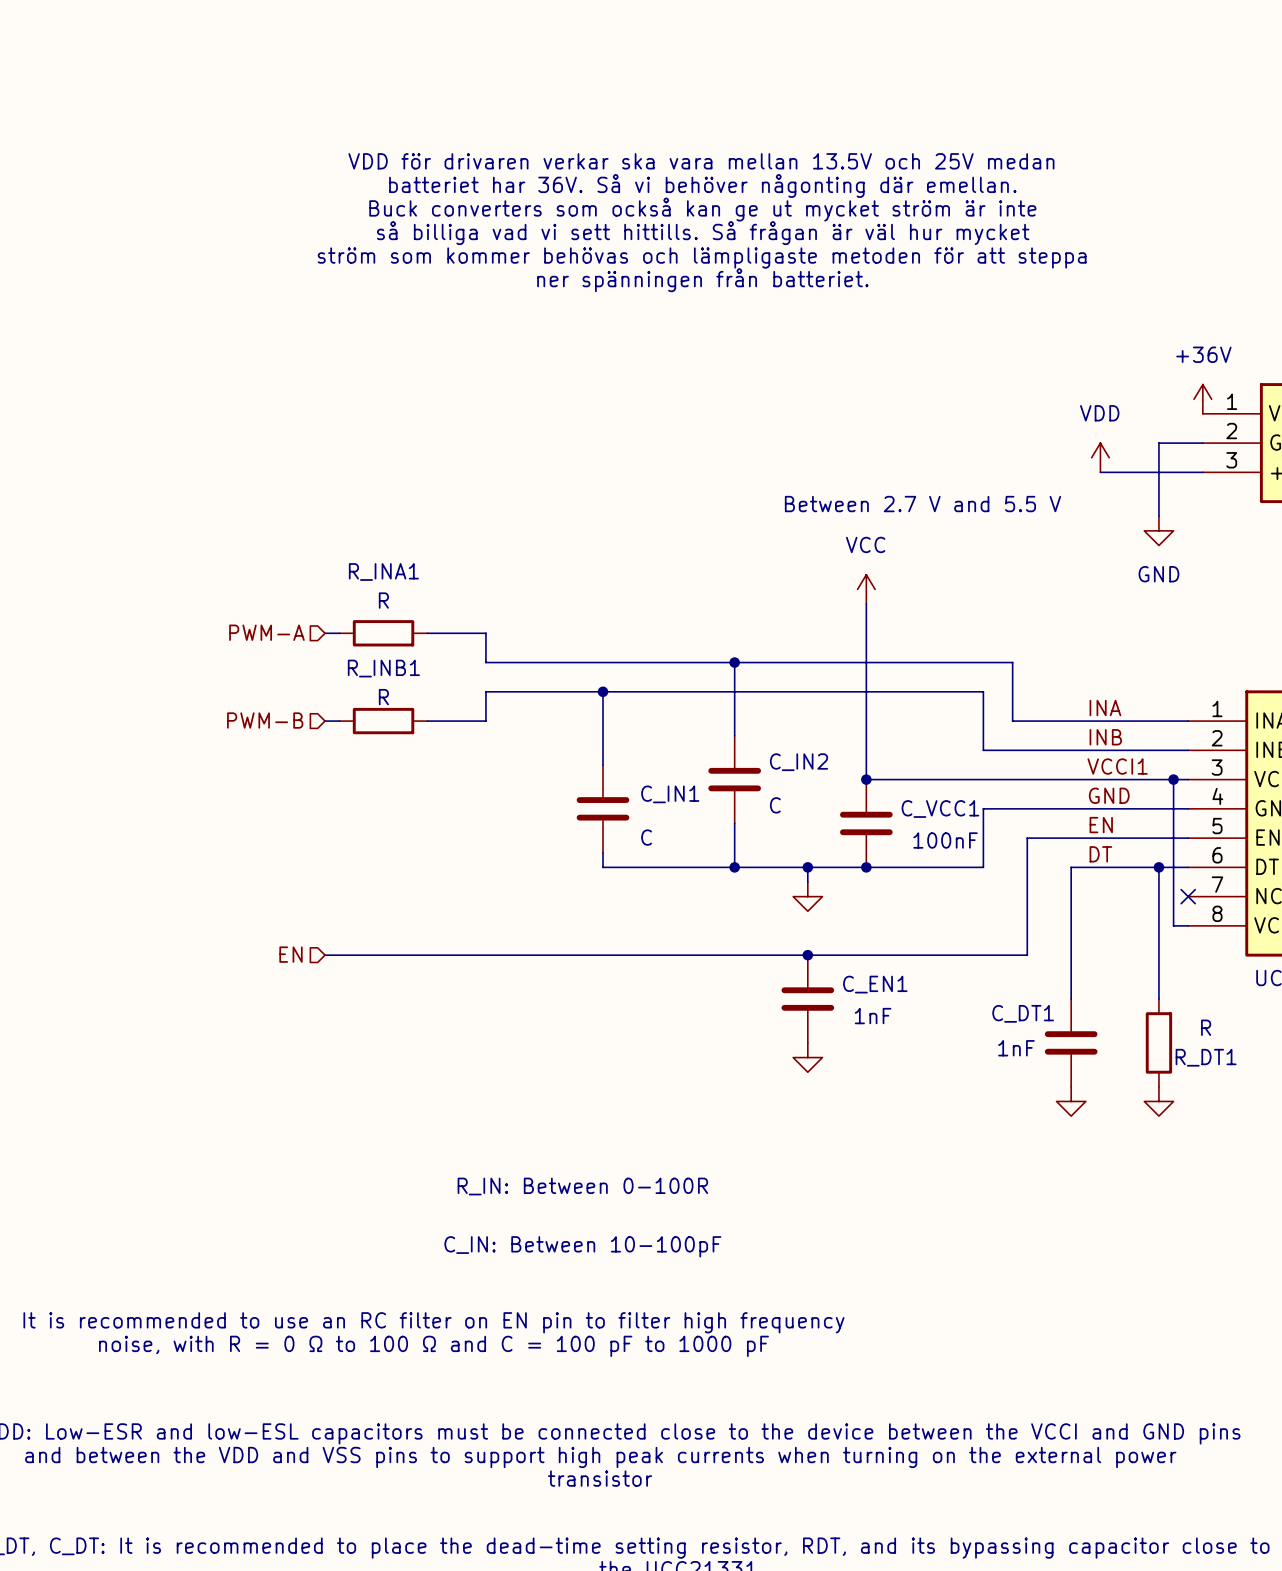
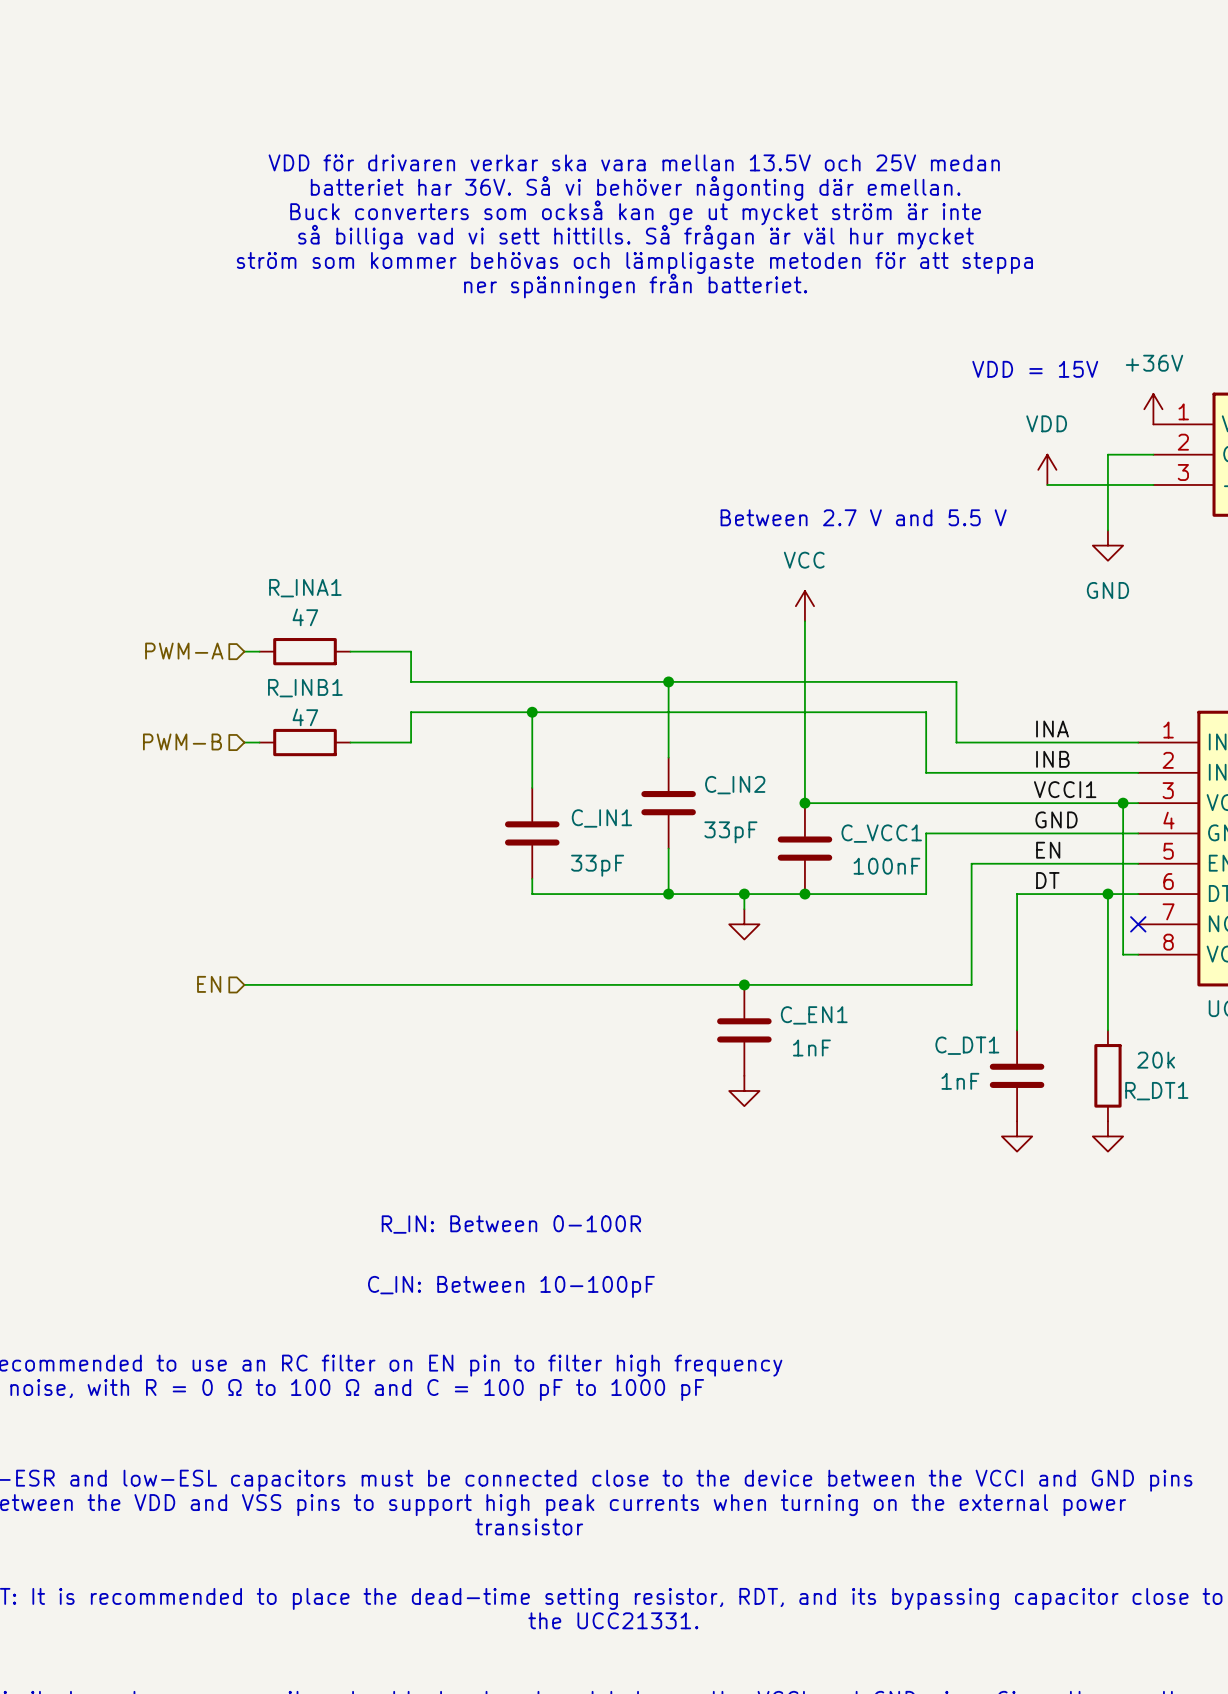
text: none -> VDD = 15V (1035, 369)
R_INA1 value: R (383, 600) -> 47 (305, 617)
R_INB1 value: R (383, 697) -> 47 (305, 717)
C_IN2 value: C (775, 805) -> 33pF (730, 832)
C_IN1 value: C (646, 837) -> 33pF (597, 865)
R_DT1 value: R (1206, 1027) -> 20k (1156, 1060)

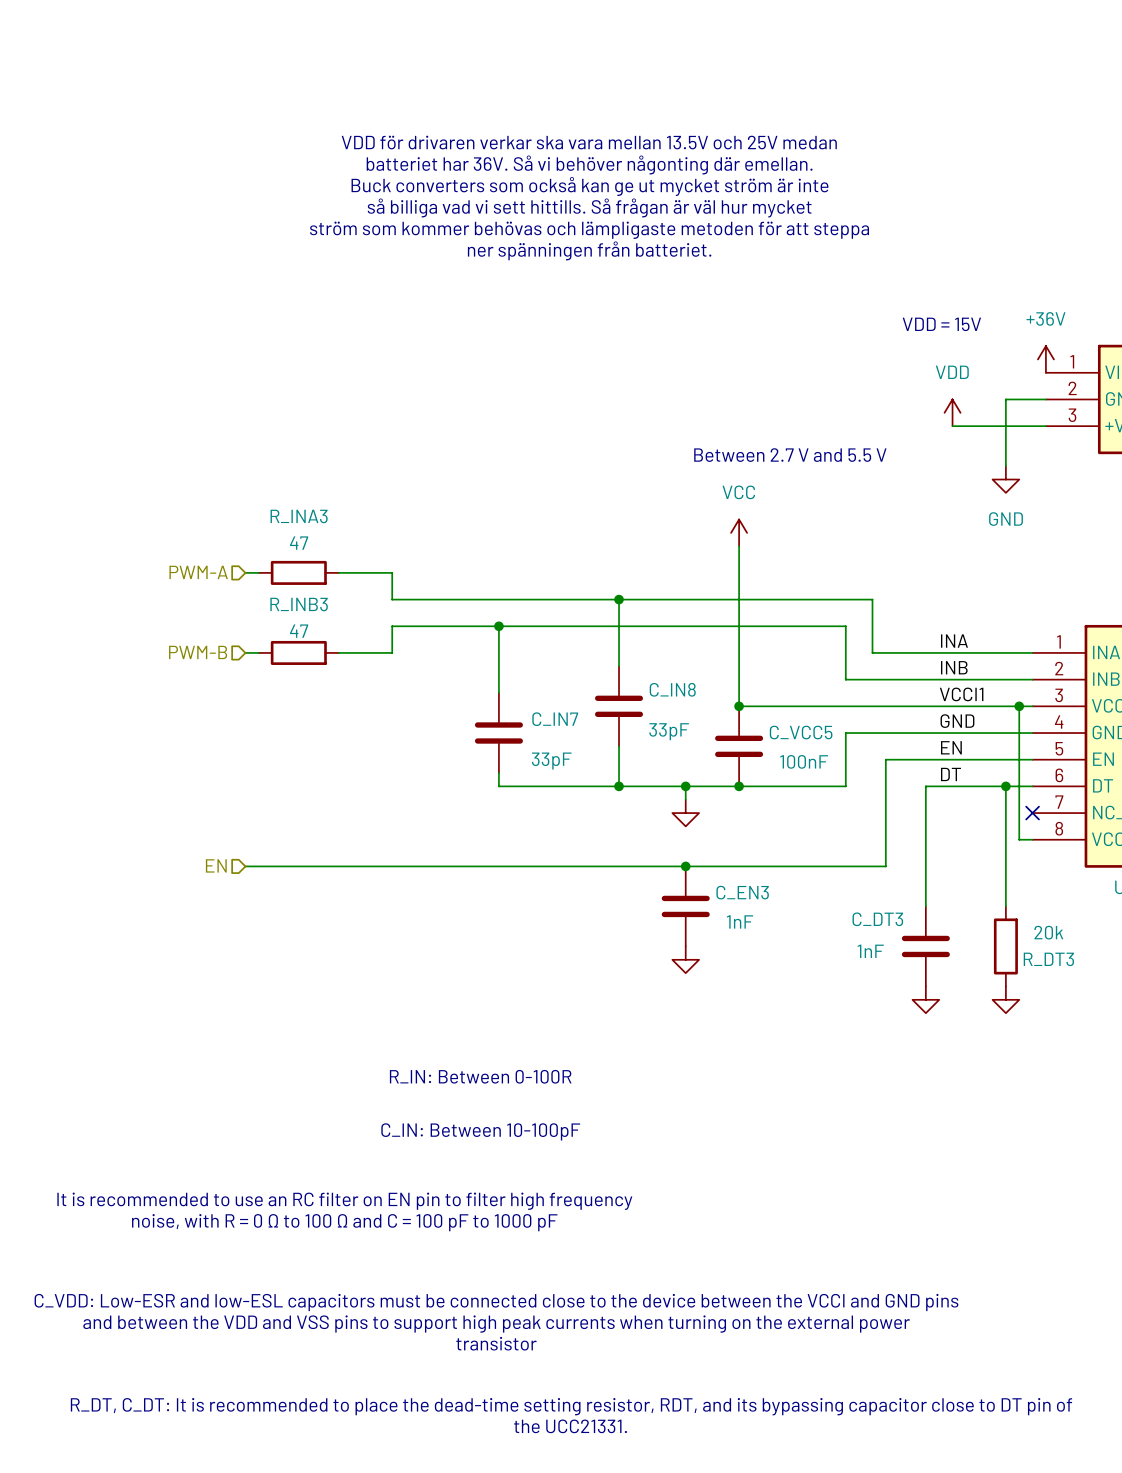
R_INA1 name: R_INA1 (305, 588) -> R_INA3 (299, 516)
R_INB1 name: R_INB1 (305, 688) -> R_INB3 (299, 604)
C_IN2 name: C_IN2 (735, 785) -> C_IN8 (672, 689)
C_IN1 name: C_IN1 (601, 818) -> C_IN7 (555, 719)
C_VCC1 name: C_VCC1 (881, 833) -> C_VCC5 (801, 732)
C_EN1 name: C_EN1 (814, 1015) -> C_EN3 (742, 892)
C_DT1 name: C_DT1 (967, 1045) -> C_DT3 (877, 919)
R_DT1 name: R_DT1 (1156, 1091) -> R_DT3 (1048, 959)

